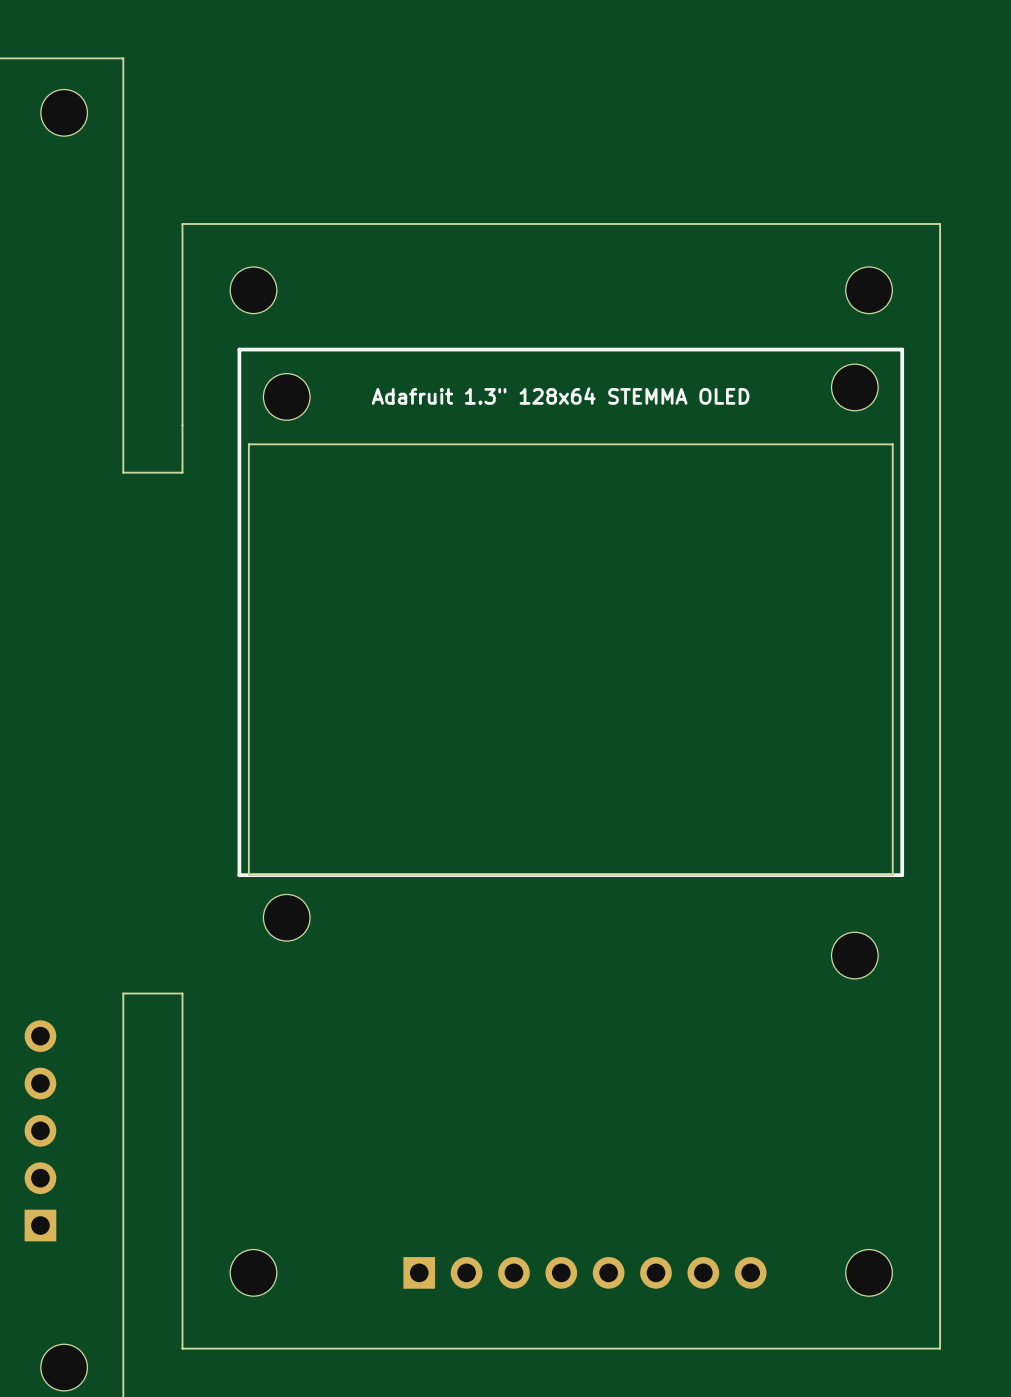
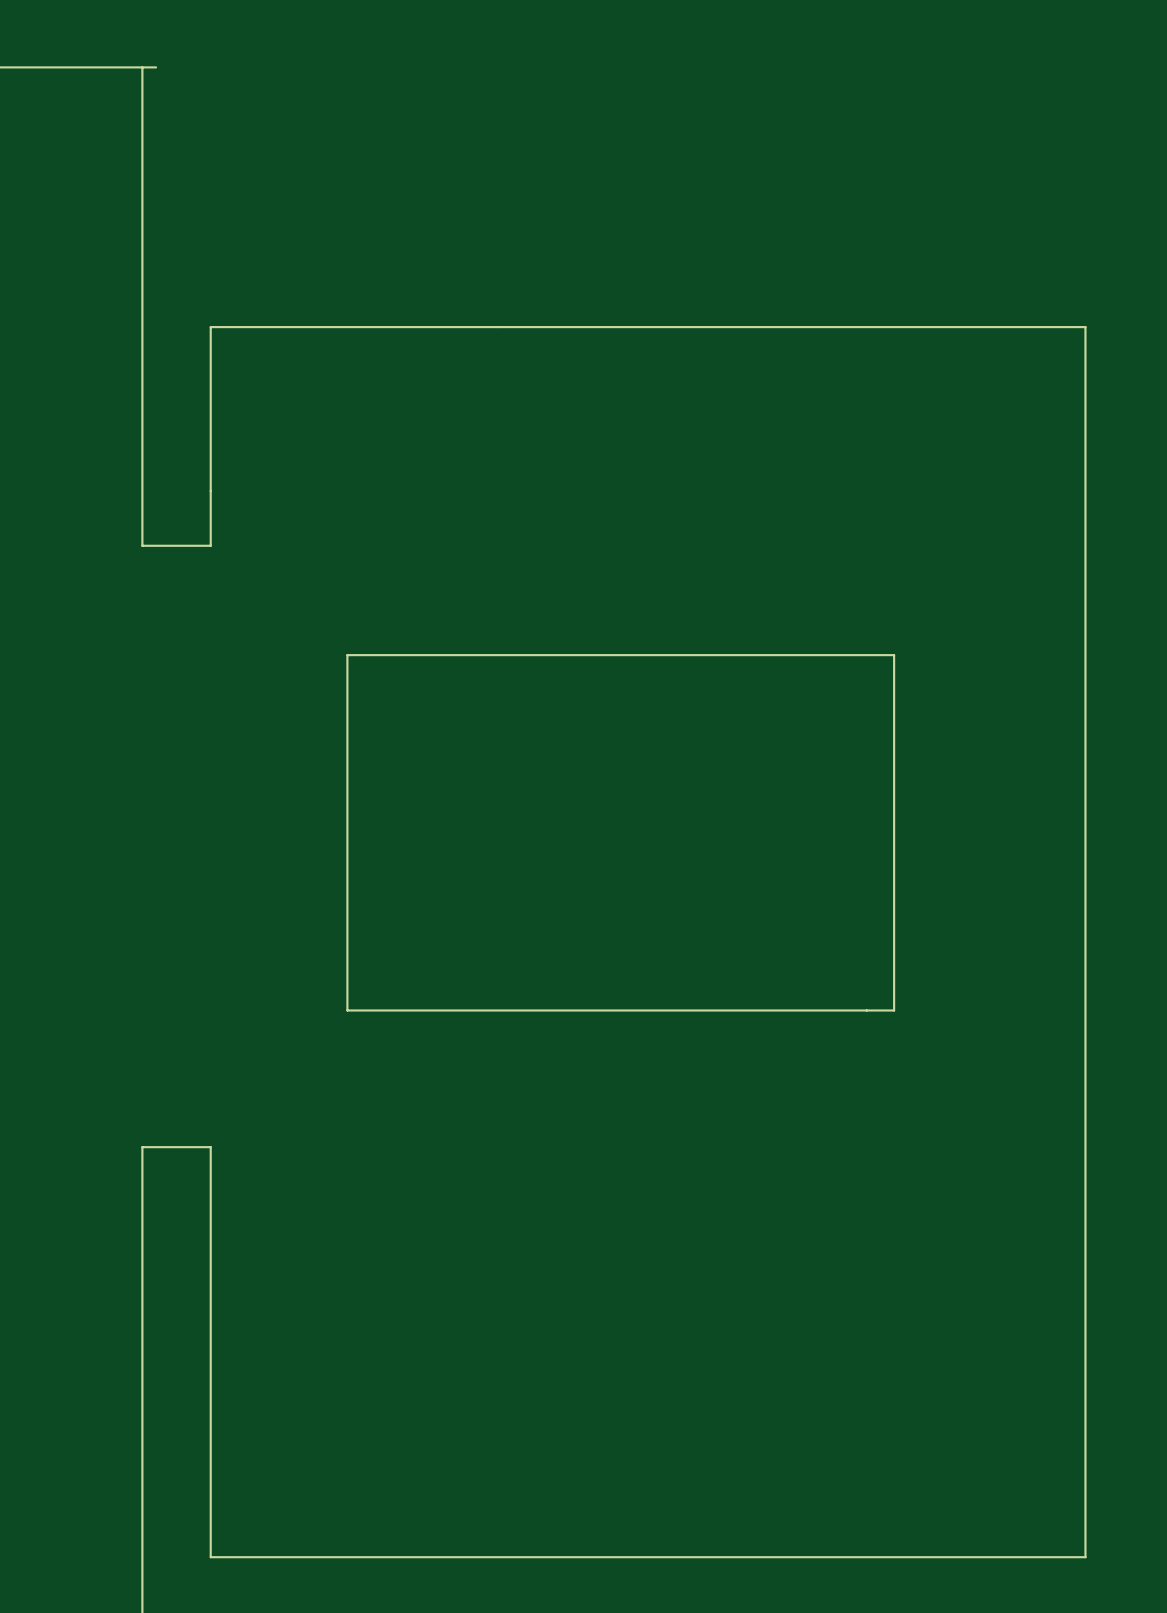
board edge: none -> (156, 67) (142, 67)
part: (64, 112) -> none
board edge: (940, 283) (940, 224) (182, 224) (182, 283) -> (1085, 327) (210, 327)
part: (253, 290) -> none
part: (869, 290) -> none
line: (902, 349) (902, 875) (239, 875) (239, 349) (902, 349) -> none
part: (854, 387) -> none
part: (286, 396) -> none
text: Adafruit 1.3" 128x64 STEMMA OLED (560, 396) -> none
board edge: (774, 875) (892, 875) (892, 444) (248, 444) (248, 875) (300, 875) -> (894, 1010) (894, 655) (347, 655) (347, 1010)
part: (286, 917) -> none
part: (854, 955) -> none
part: (40, 1130) -> none
part: (253, 1272) -> none
part: (584, 1272) -> none
part: (869, 1272) -> none
part: (64, 1367) -> none

